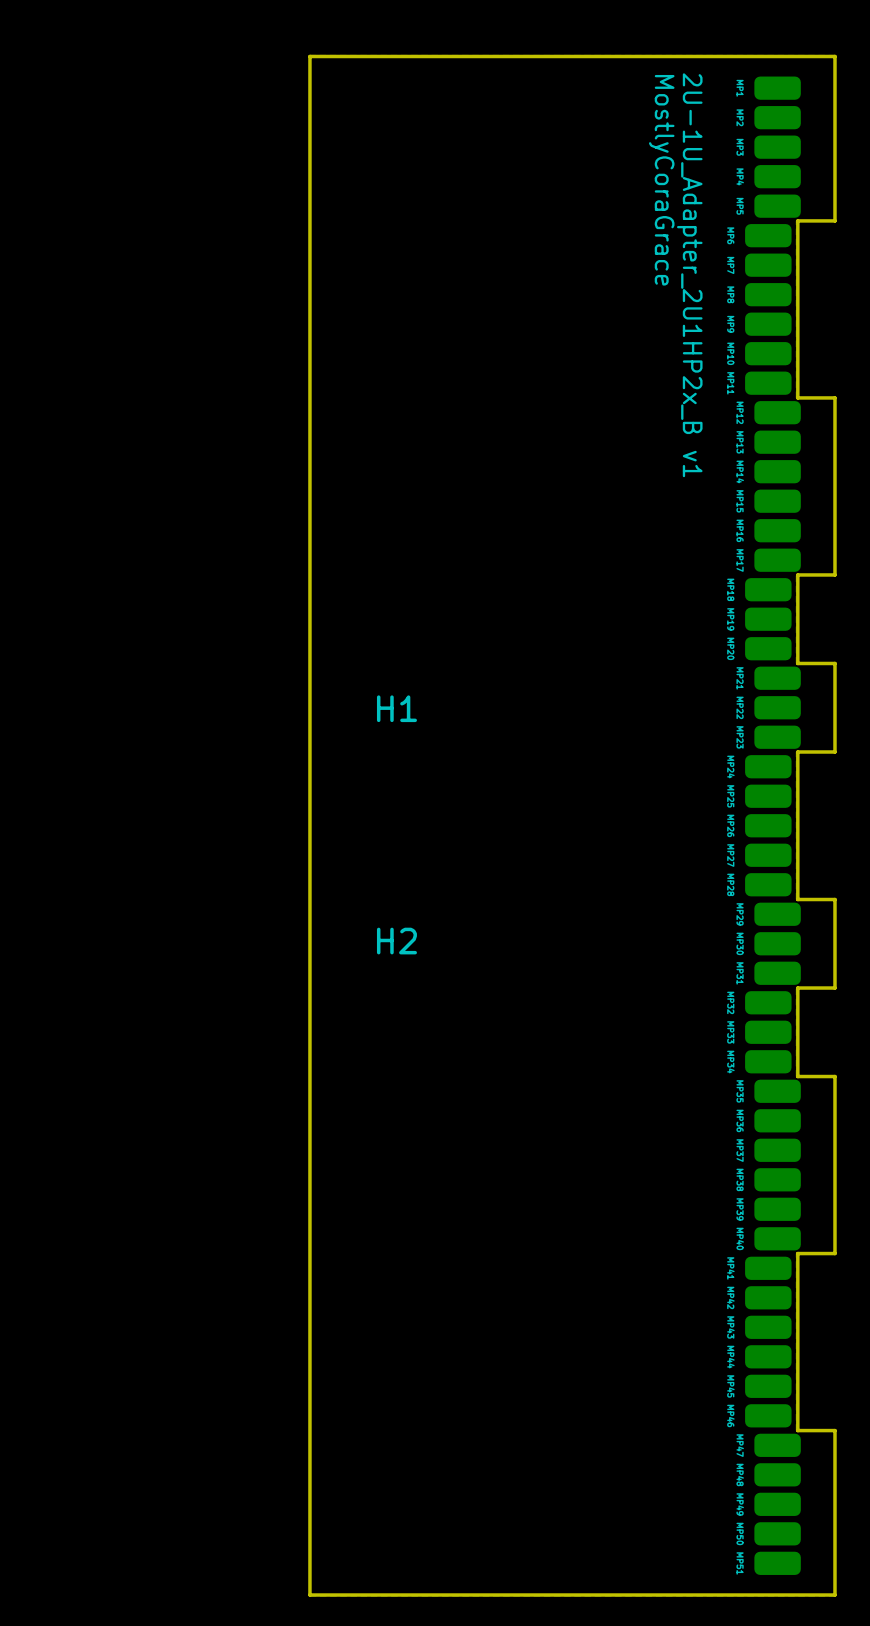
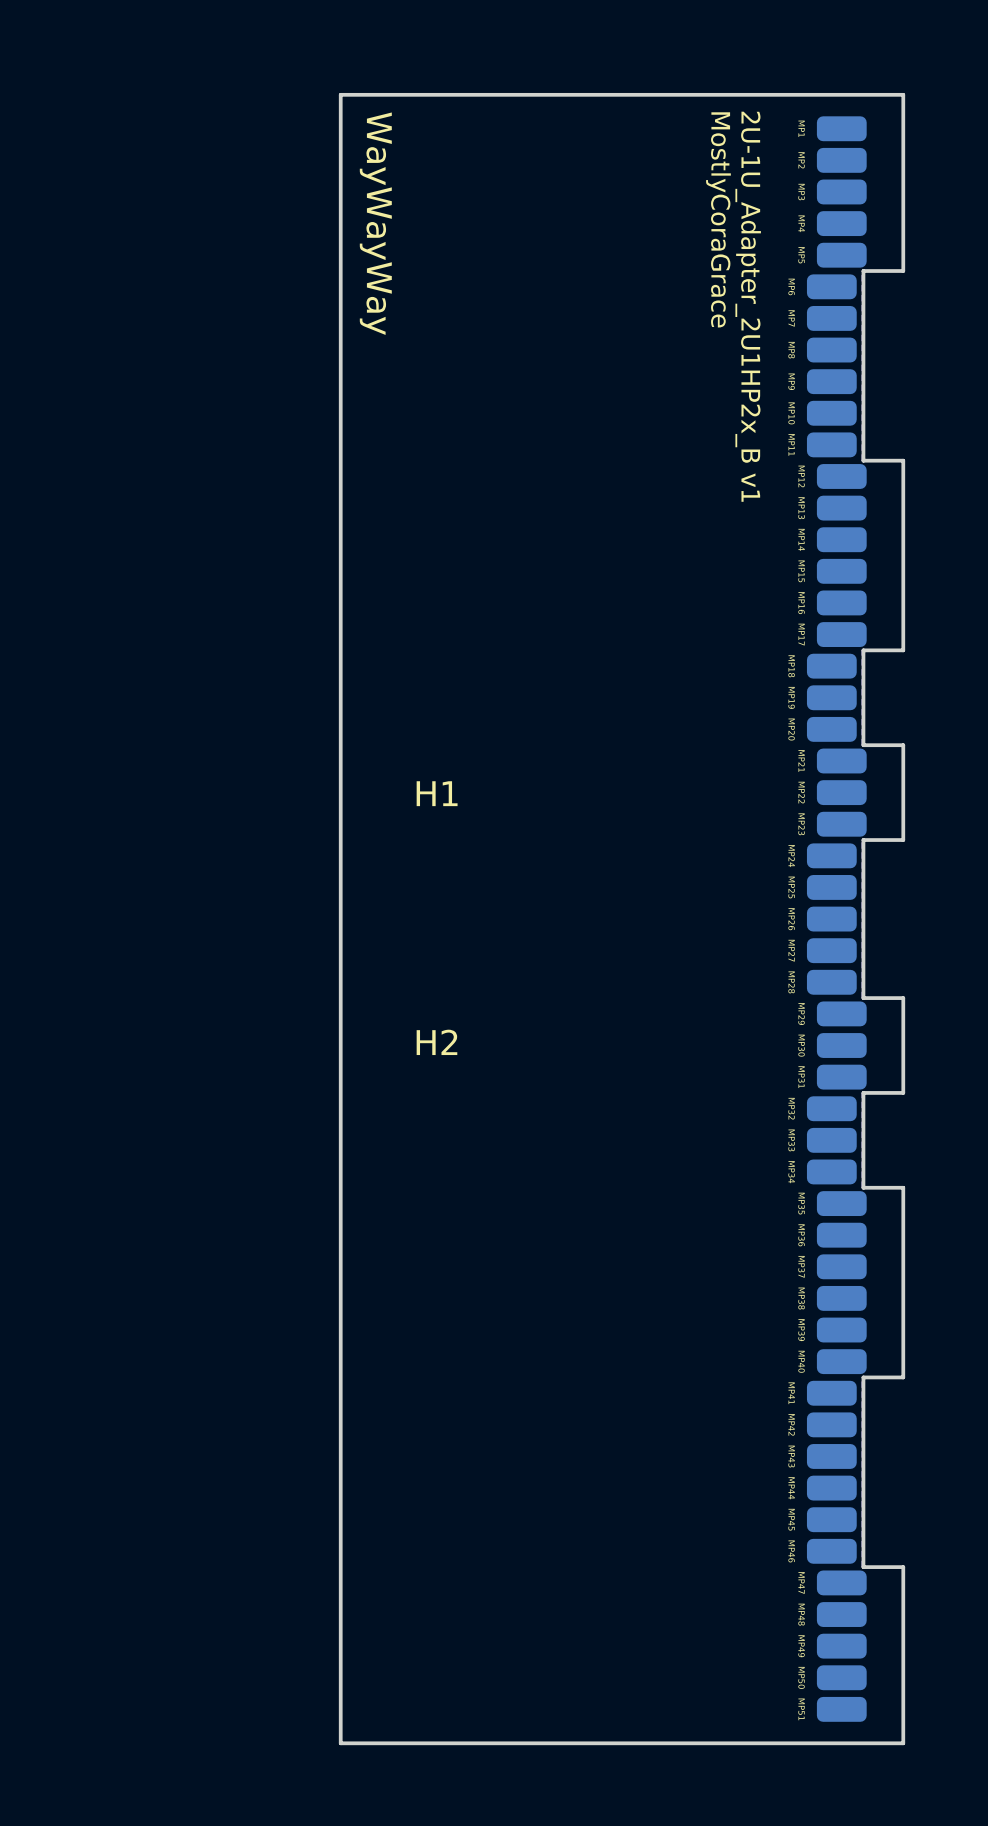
text: none -> WayWayWay (375, 223)

